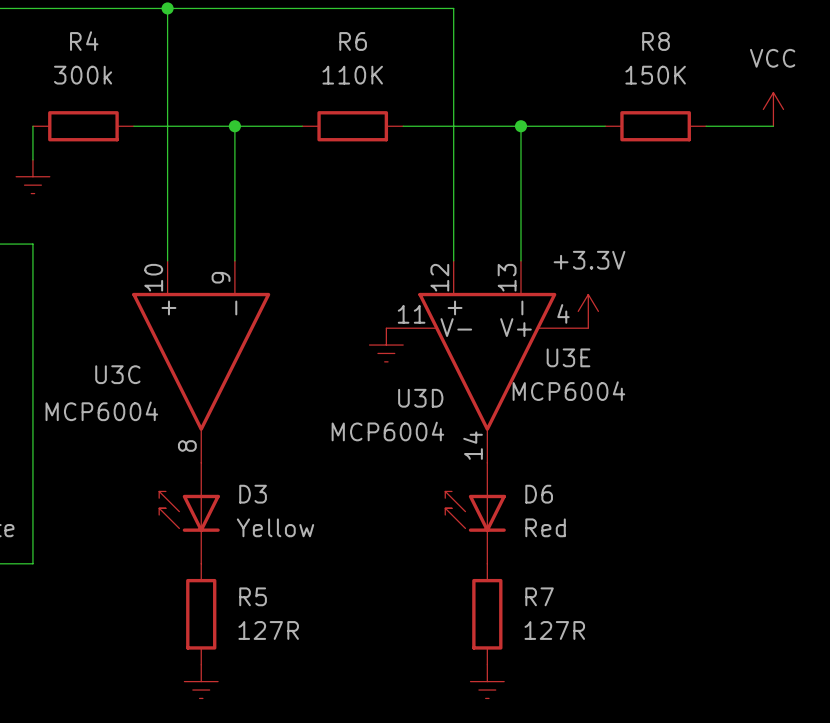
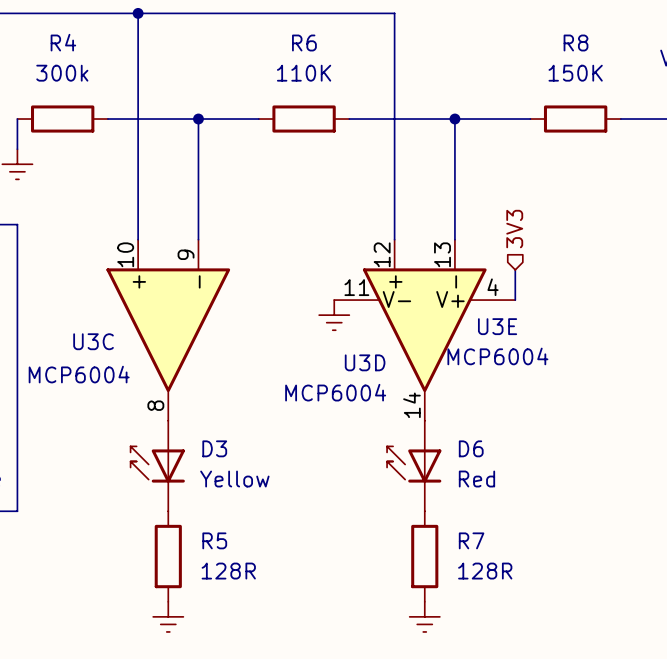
hierarchical label: none -> 3V3 (514, 229)
power symbol: +3.3V (588, 311) -> none
R5 value: 127R (268, 630) -> 128R (228, 571)
R7 value: 127R (554, 630) -> 128R (485, 571)

